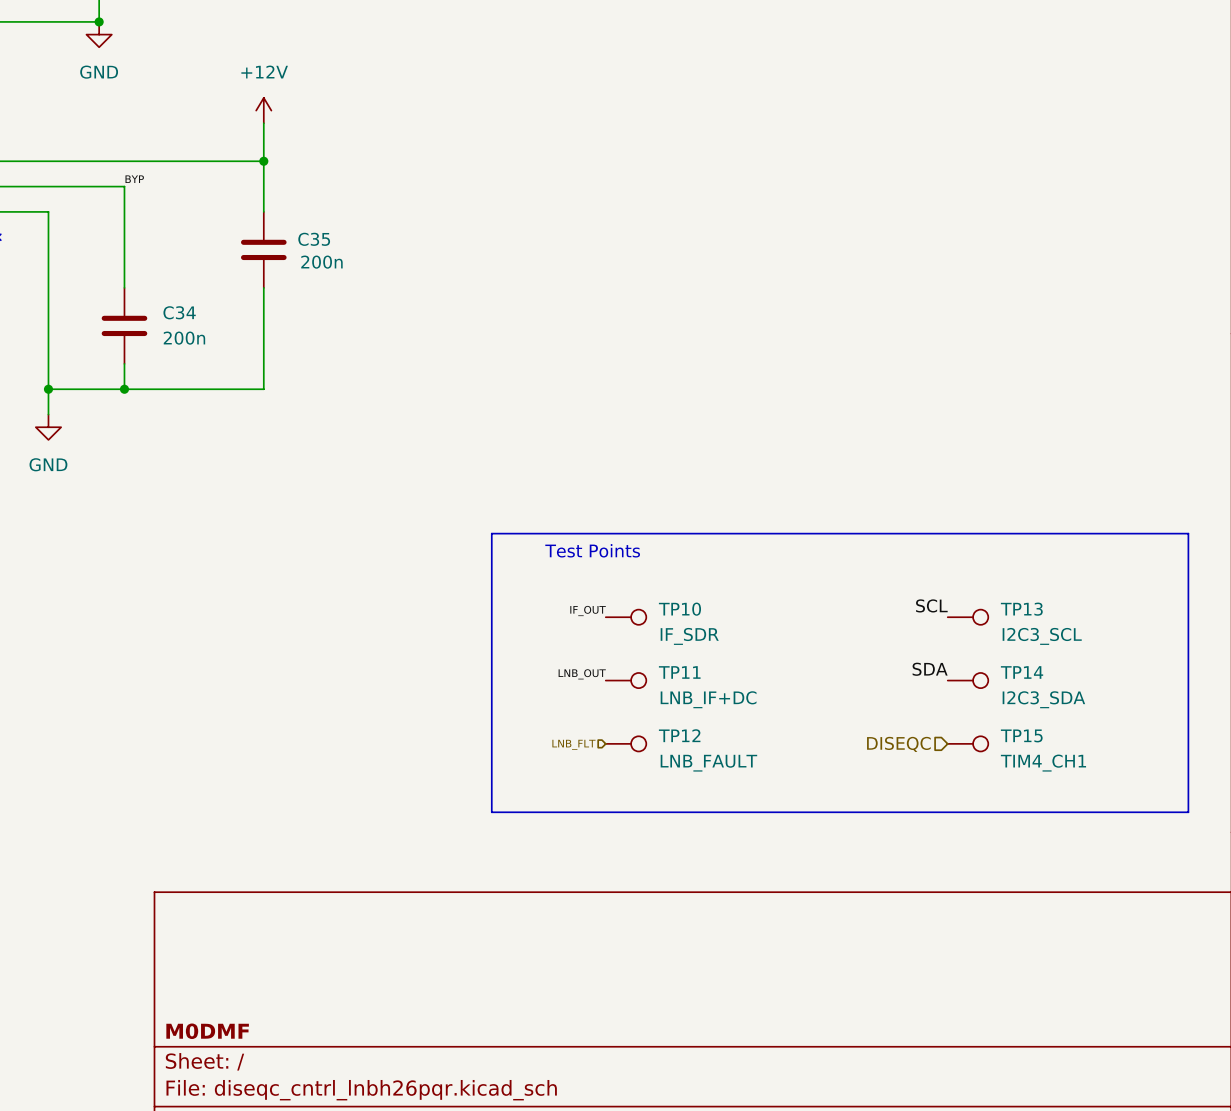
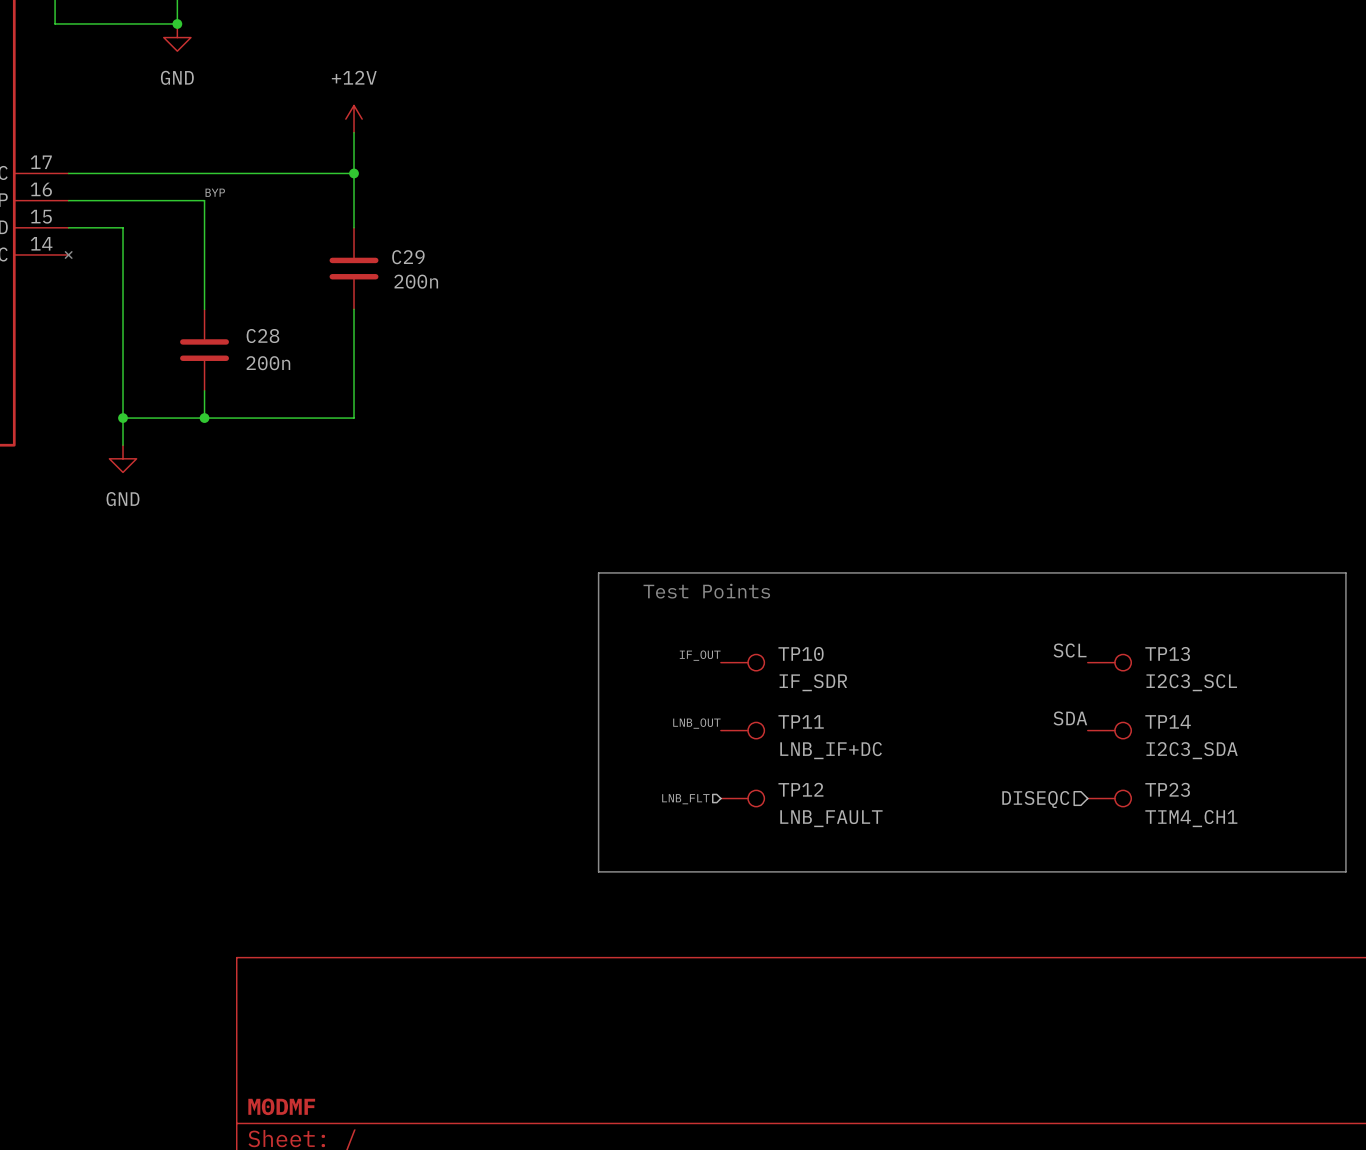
C35 name: C35 (314, 239) -> C29 (408, 257)
C34 name: C34 (179, 312) -> C28 (262, 336)
TP15 name: TP15 (1021, 735) -> TP23 (1167, 789)

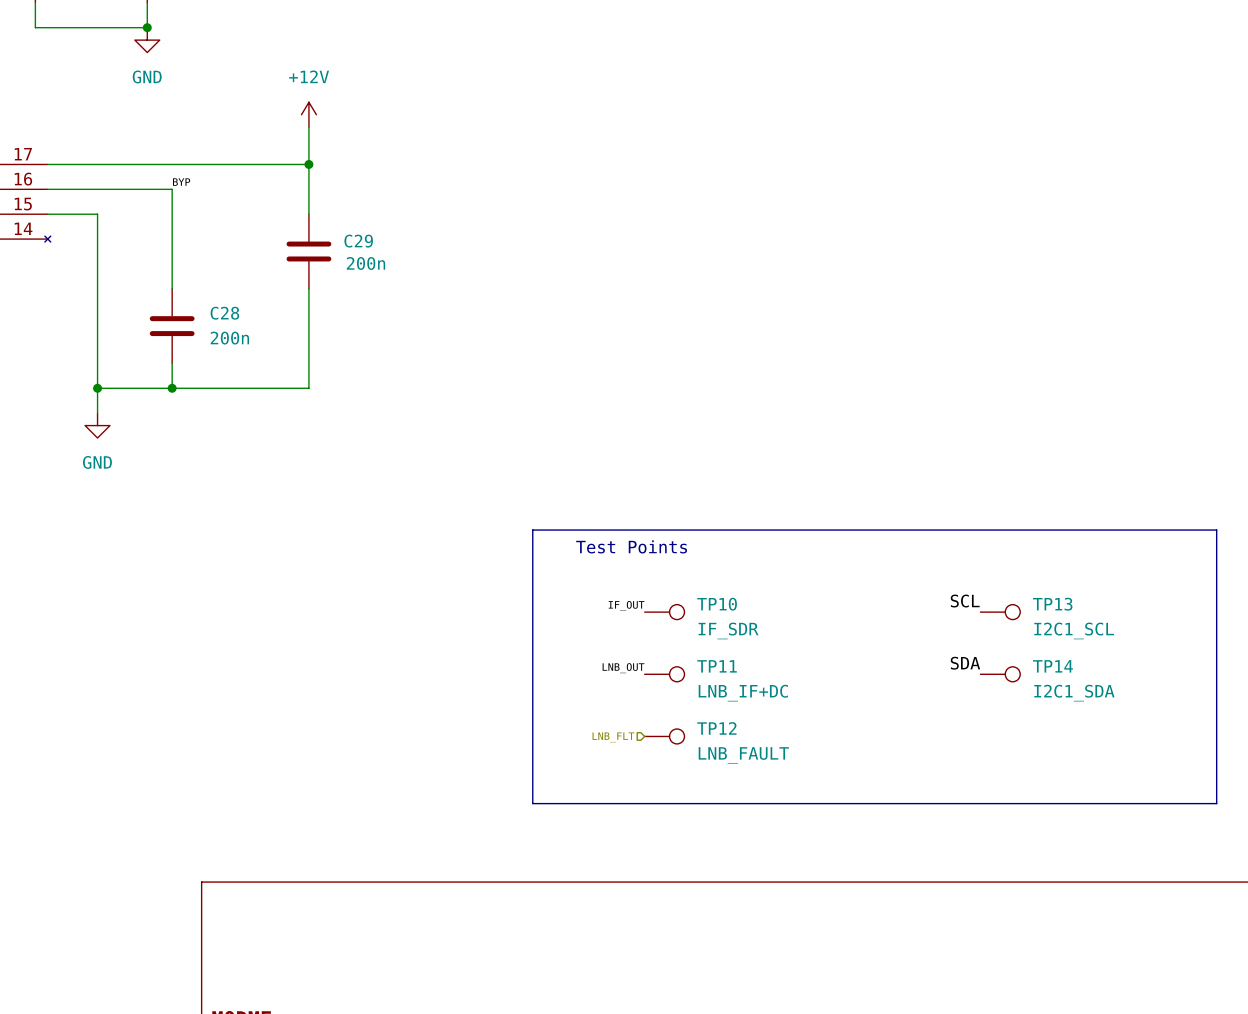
TP13 value: I2C3_SCL (1191, 682) -> I2C1_SCL (1074, 630)
TP14 value: I2C3_SDA (1192, 750) -> I2C1_SDA (1074, 693)
TP23: TIM4_CH1 (1109, 798) -> none
hierarchical label: DISEQC (1035, 799) -> none

